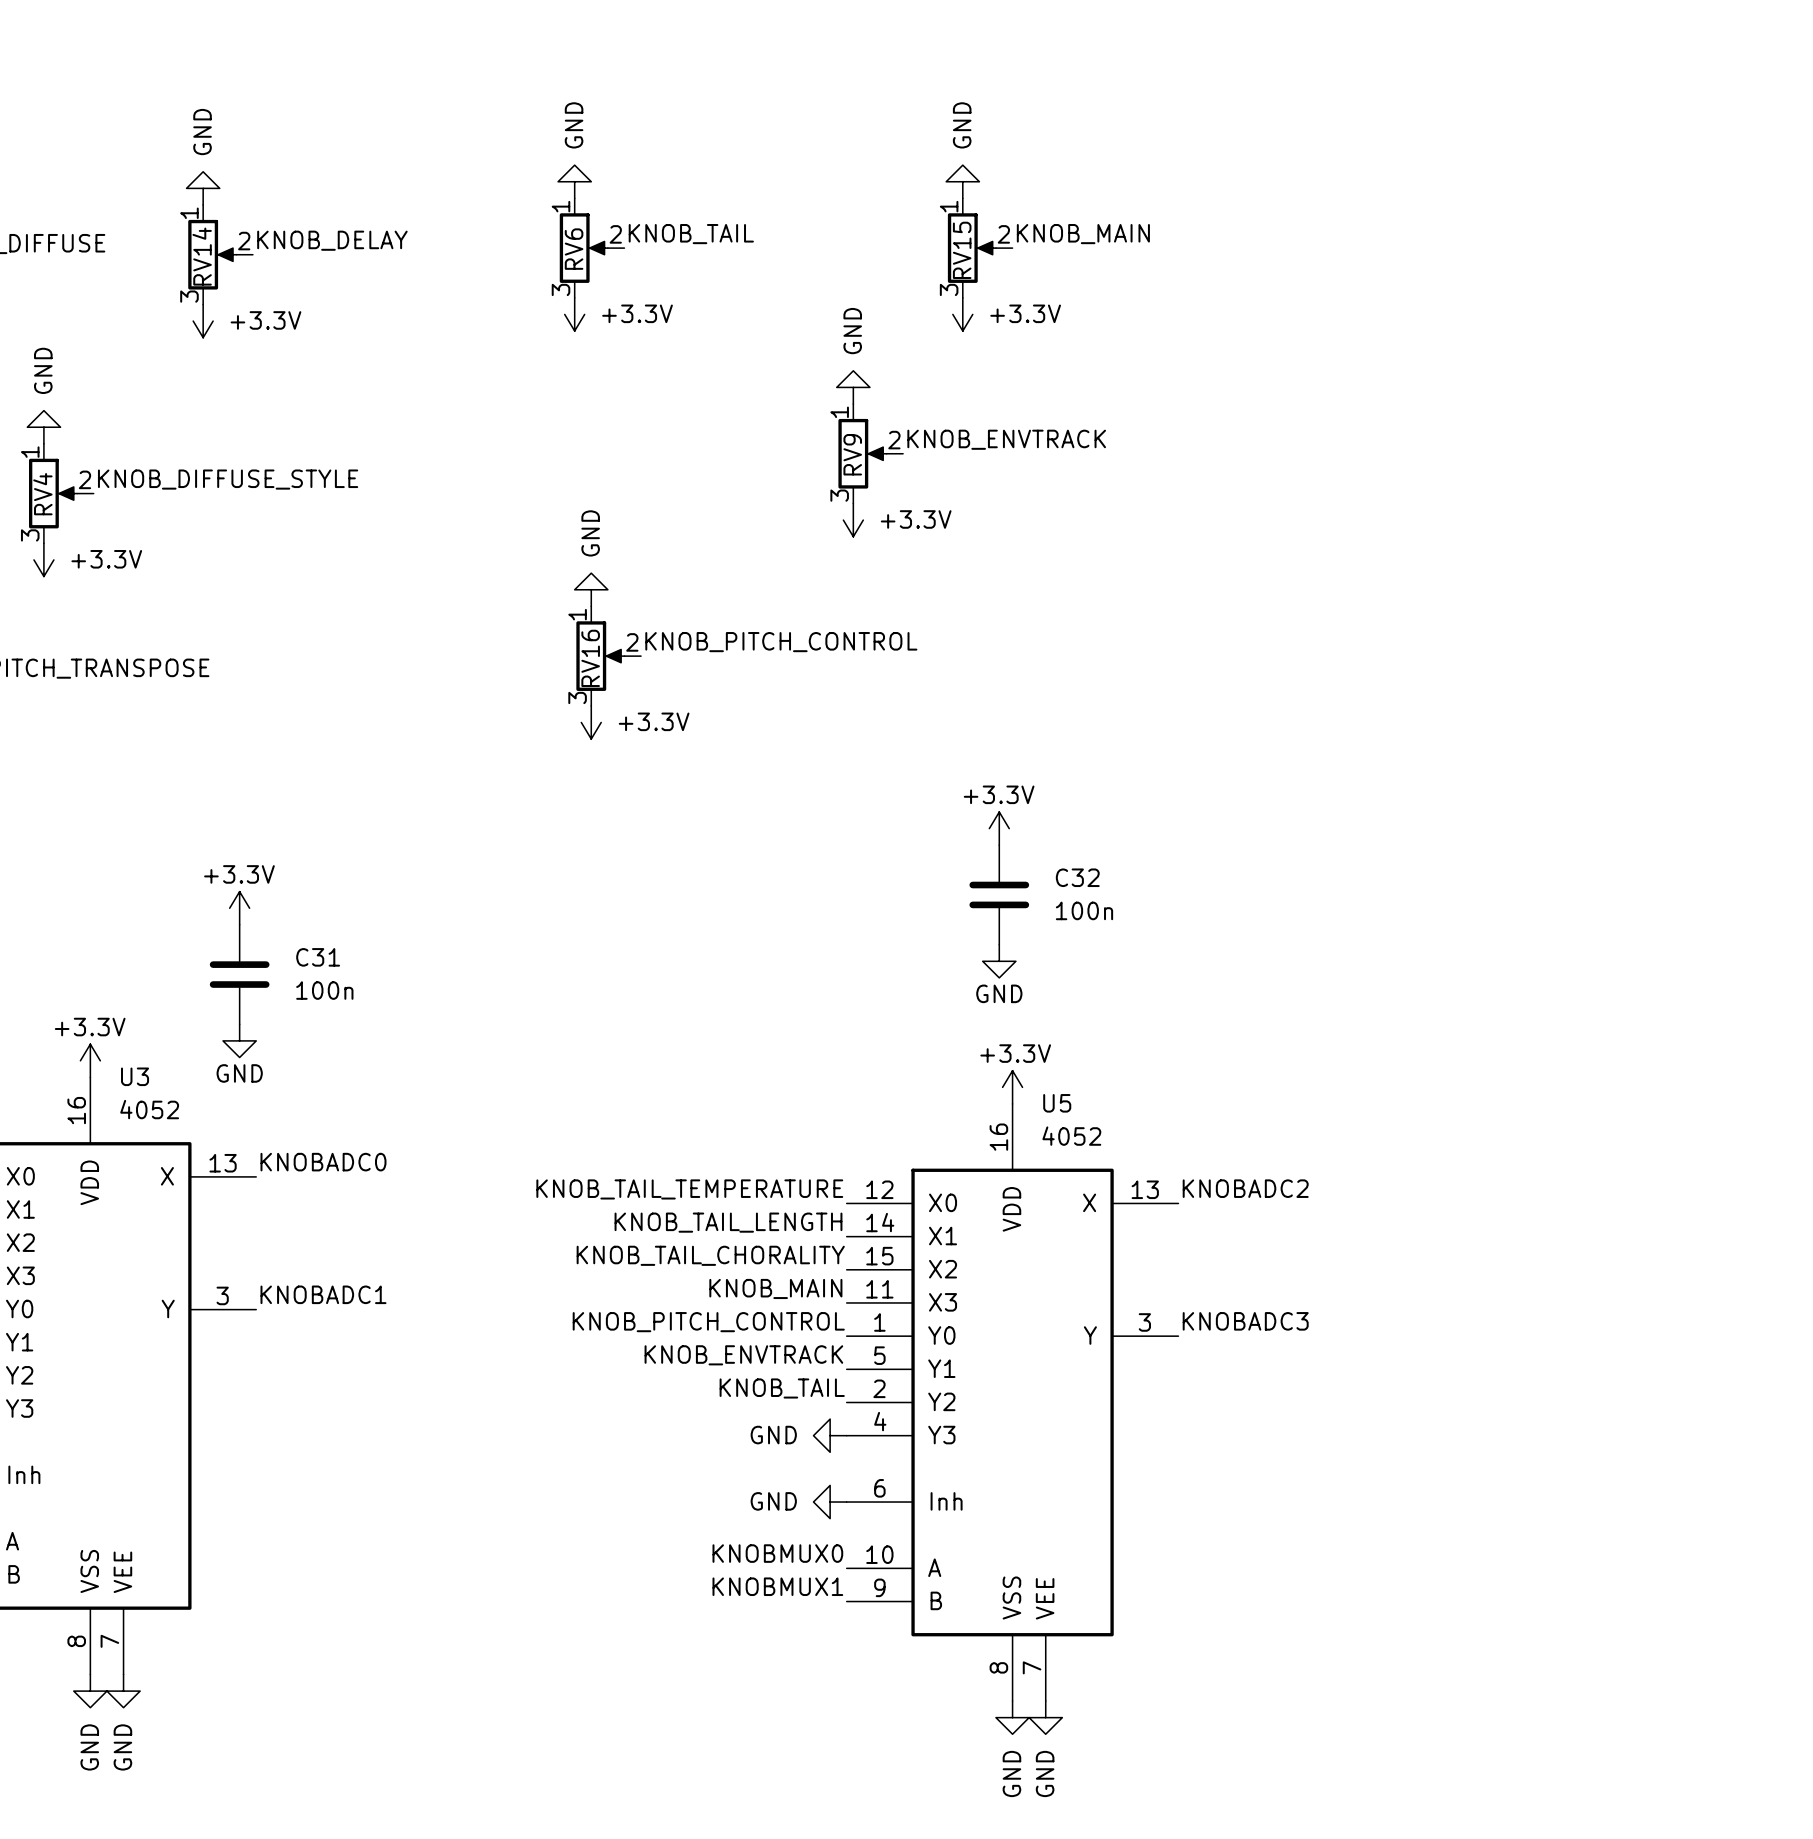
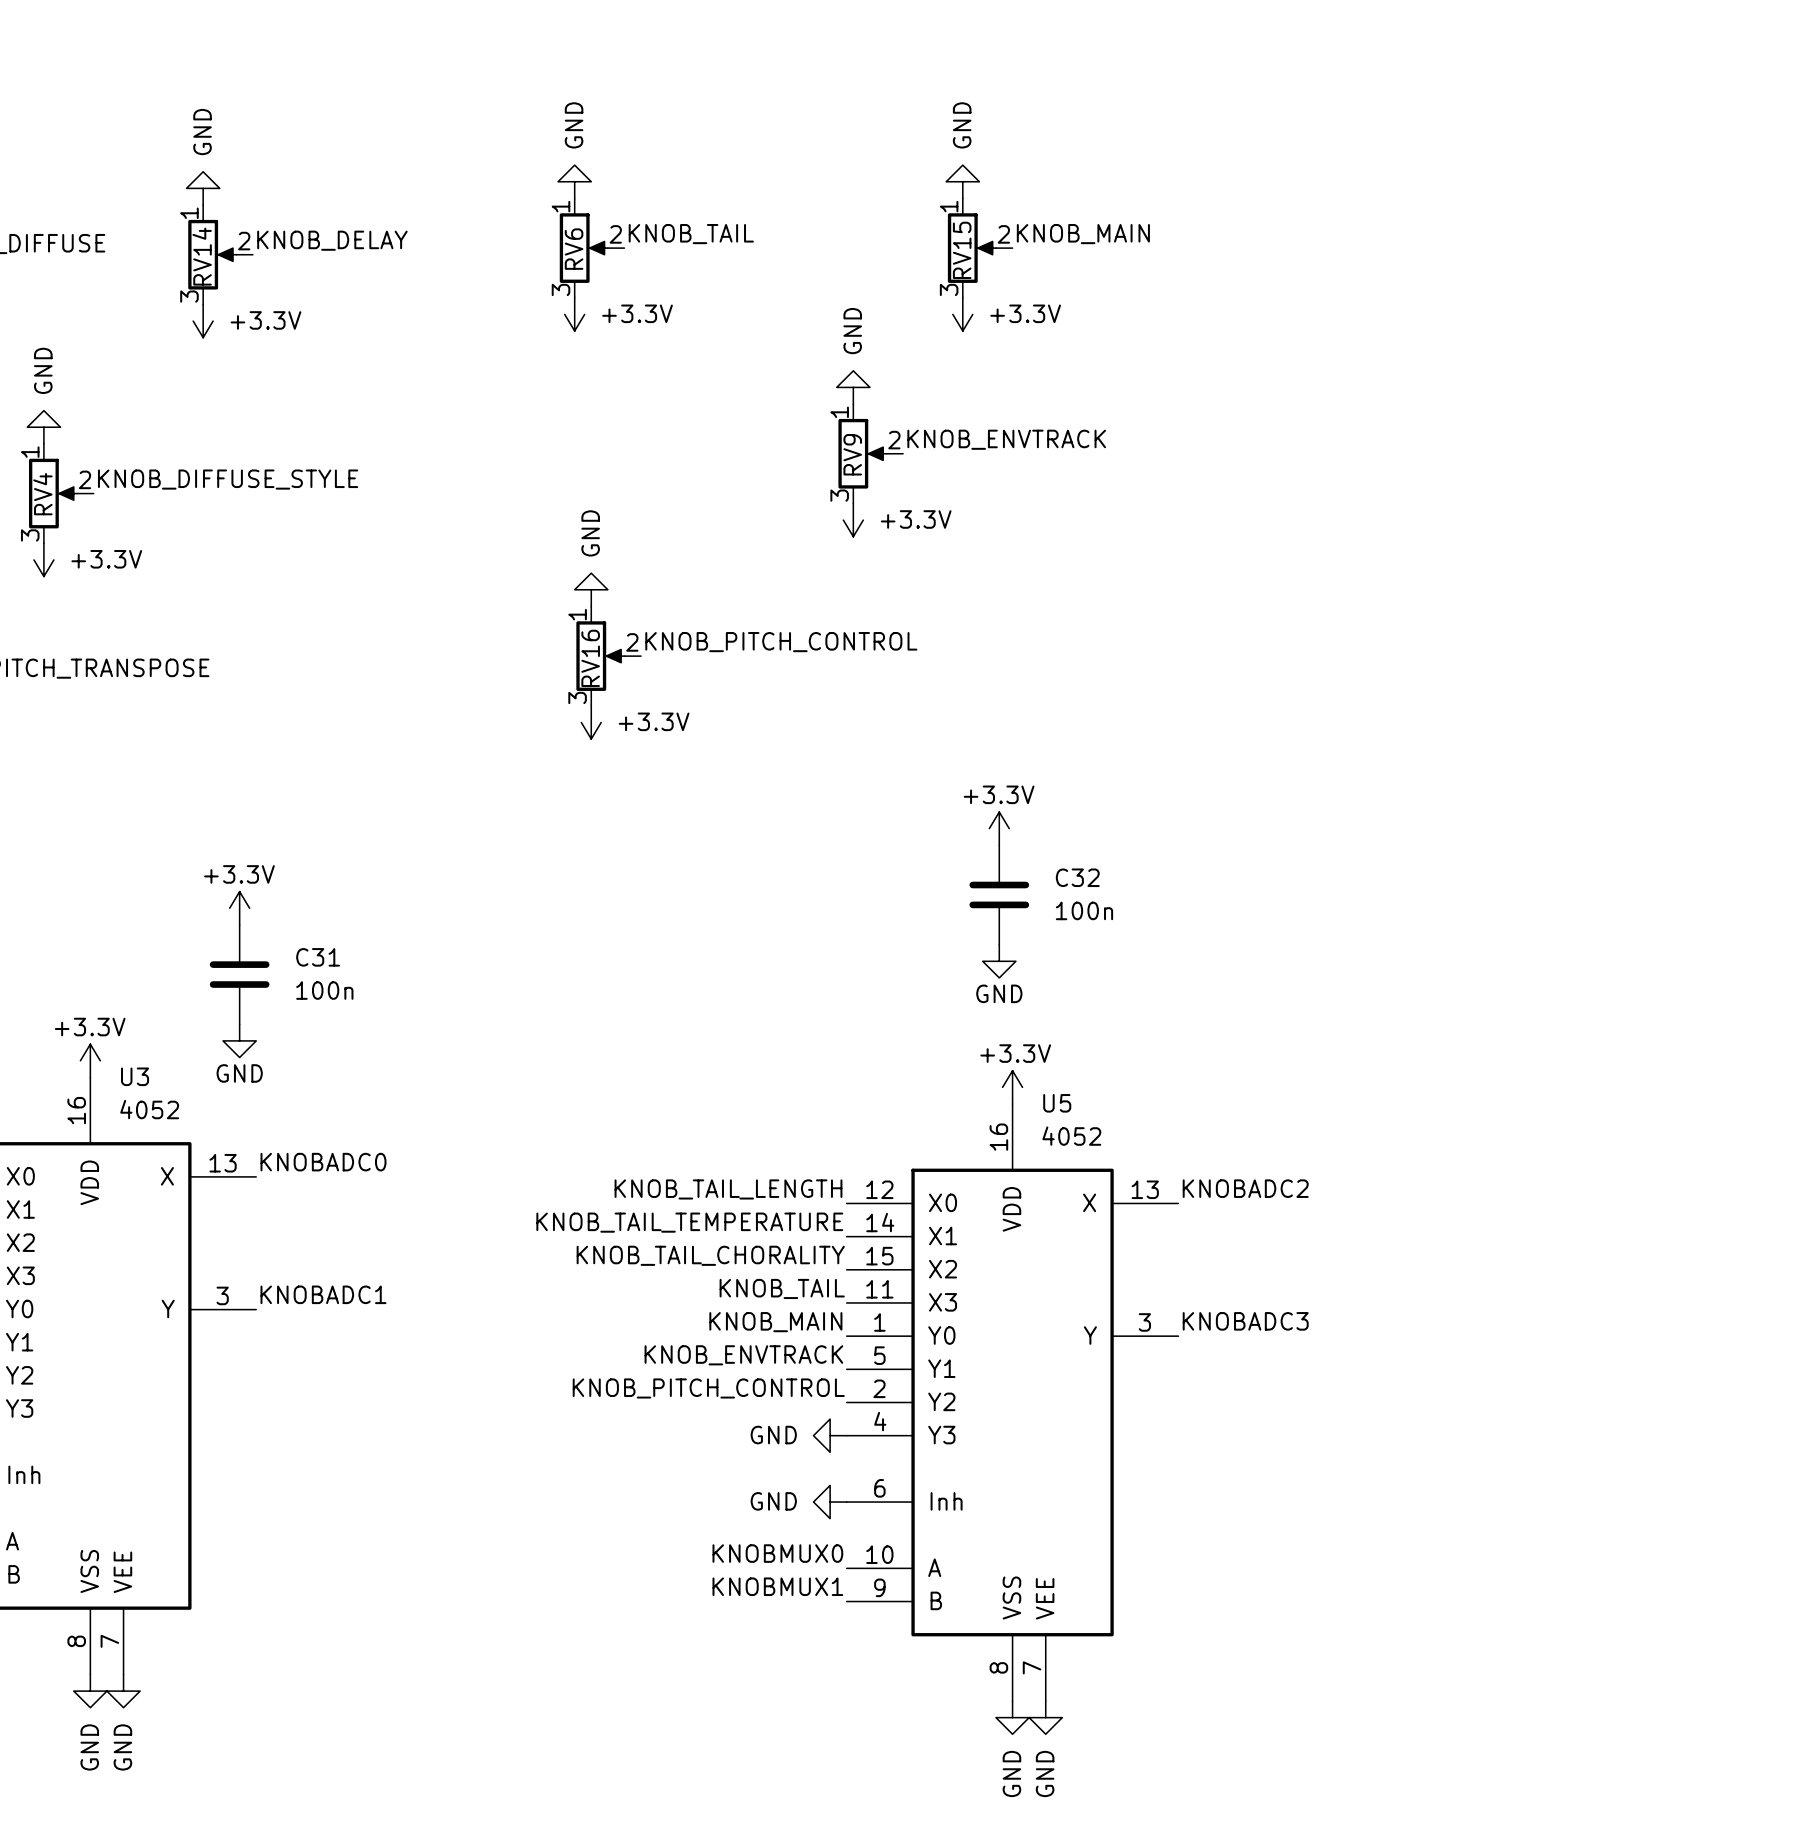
label: KNOB_TAIL_TEMPERATURE (689, 1189) -> KNOB_TAIL_LENGTH (728, 1189)
label: KNOB_TAIL_LENGTH (728, 1222) -> KNOB_TAIL_TEMPERATURE (689, 1222)
label: KNOB_MAIN (775, 1288) -> KNOB_TAIL (782, 1288)
label: KNOB_PITCH_CONTROL (708, 1322) -> KNOB_MAIN (775, 1322)
label: KNOB_TAIL (782, 1388) -> KNOB_PITCH_CONTROL (708, 1388)

